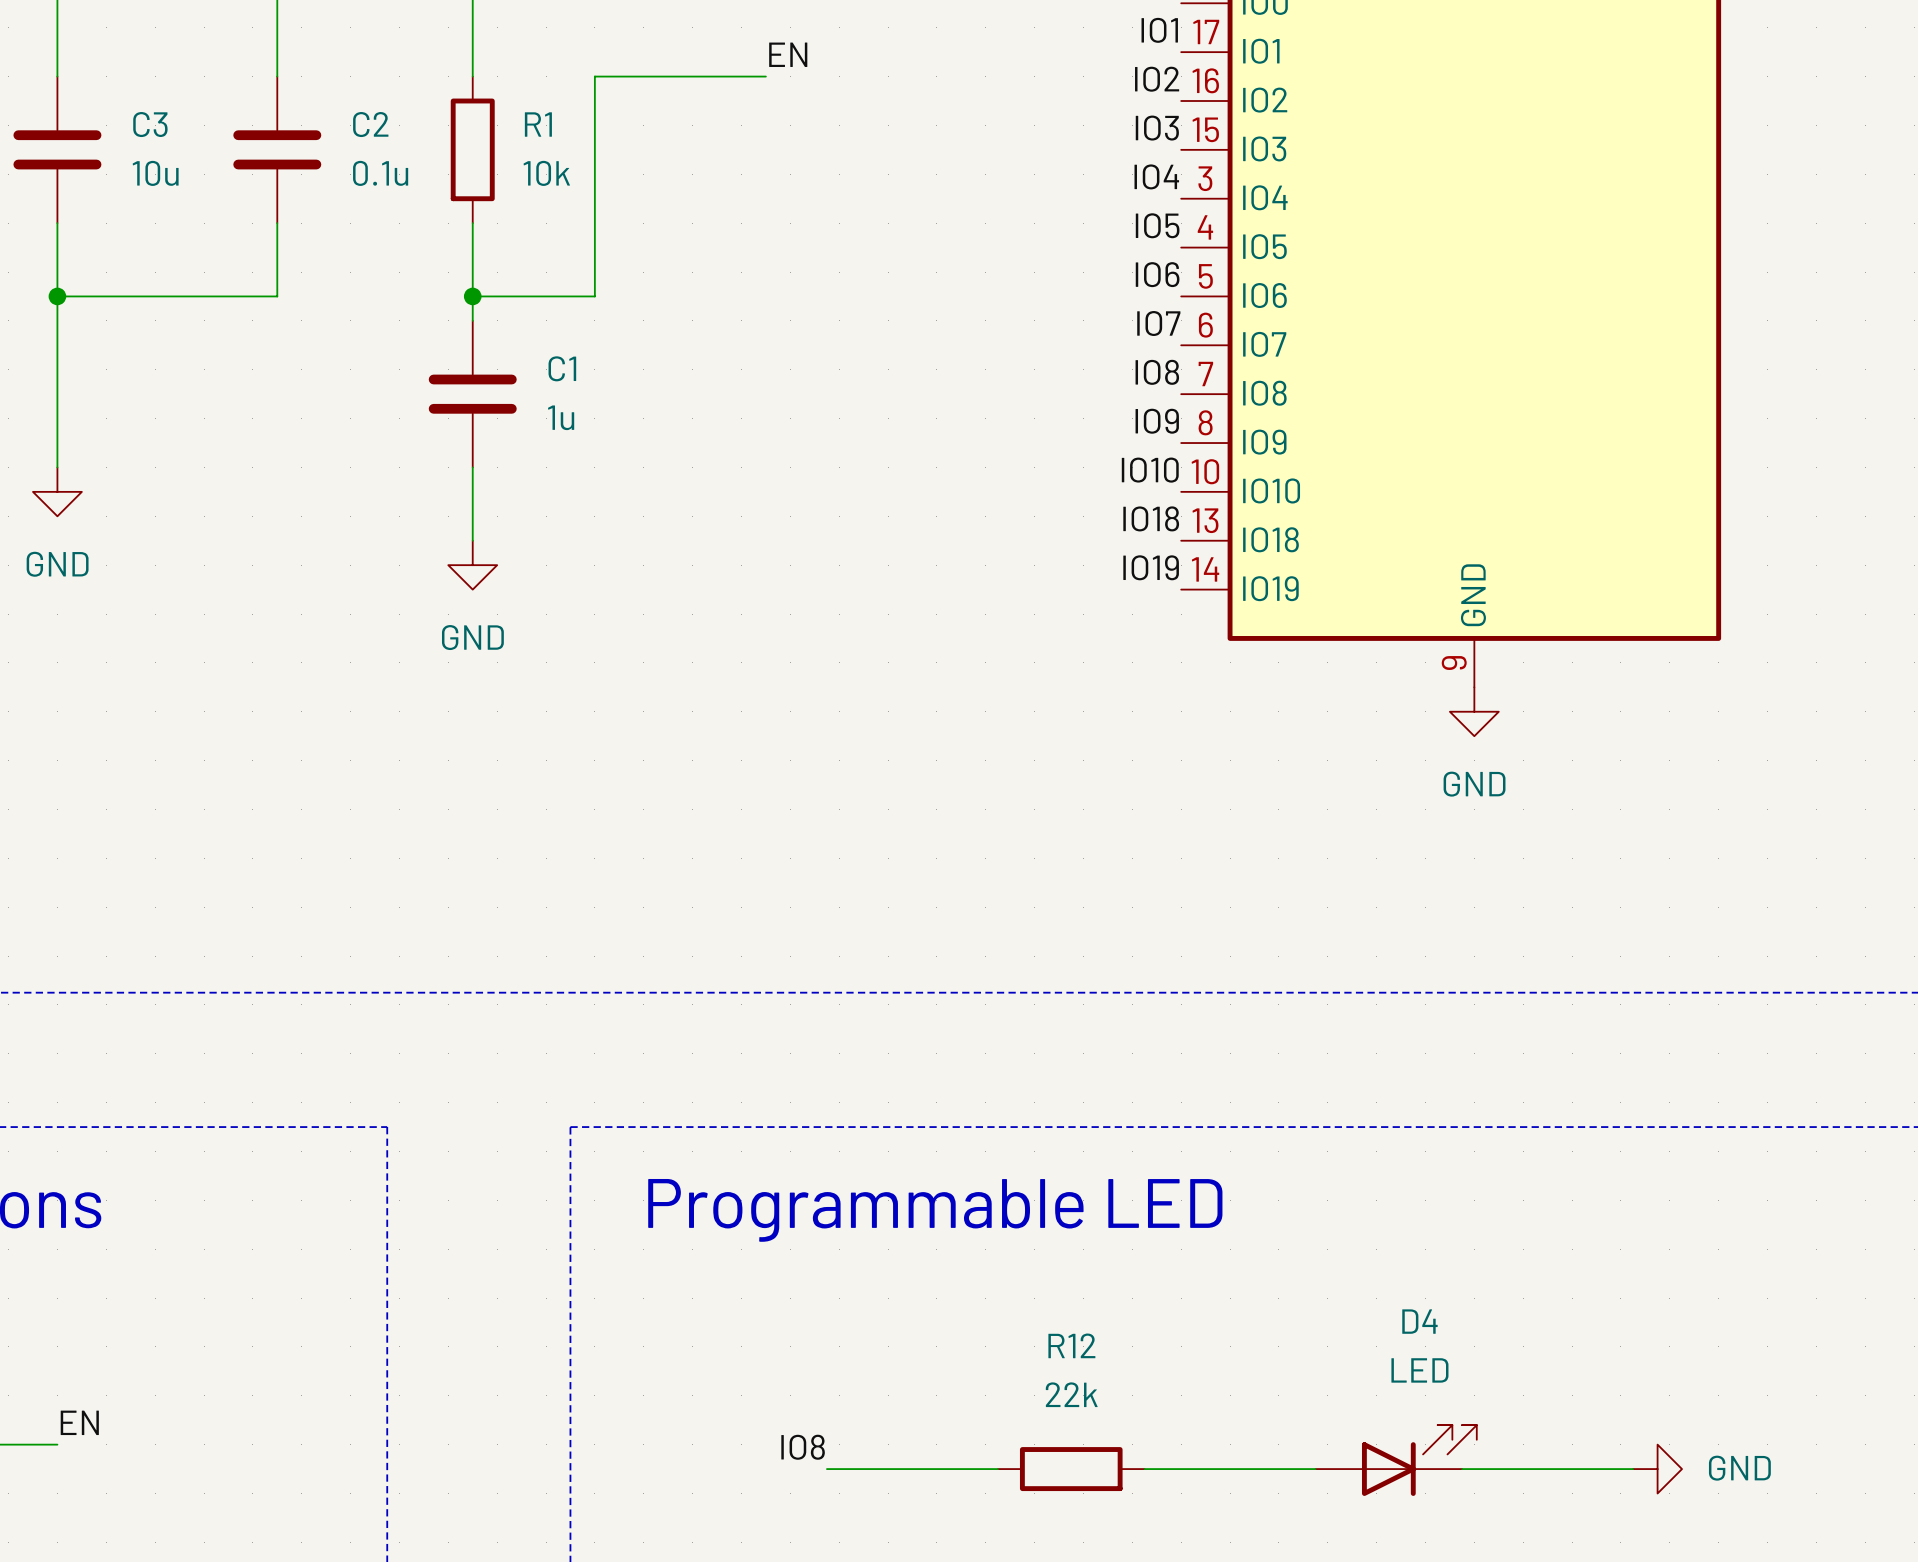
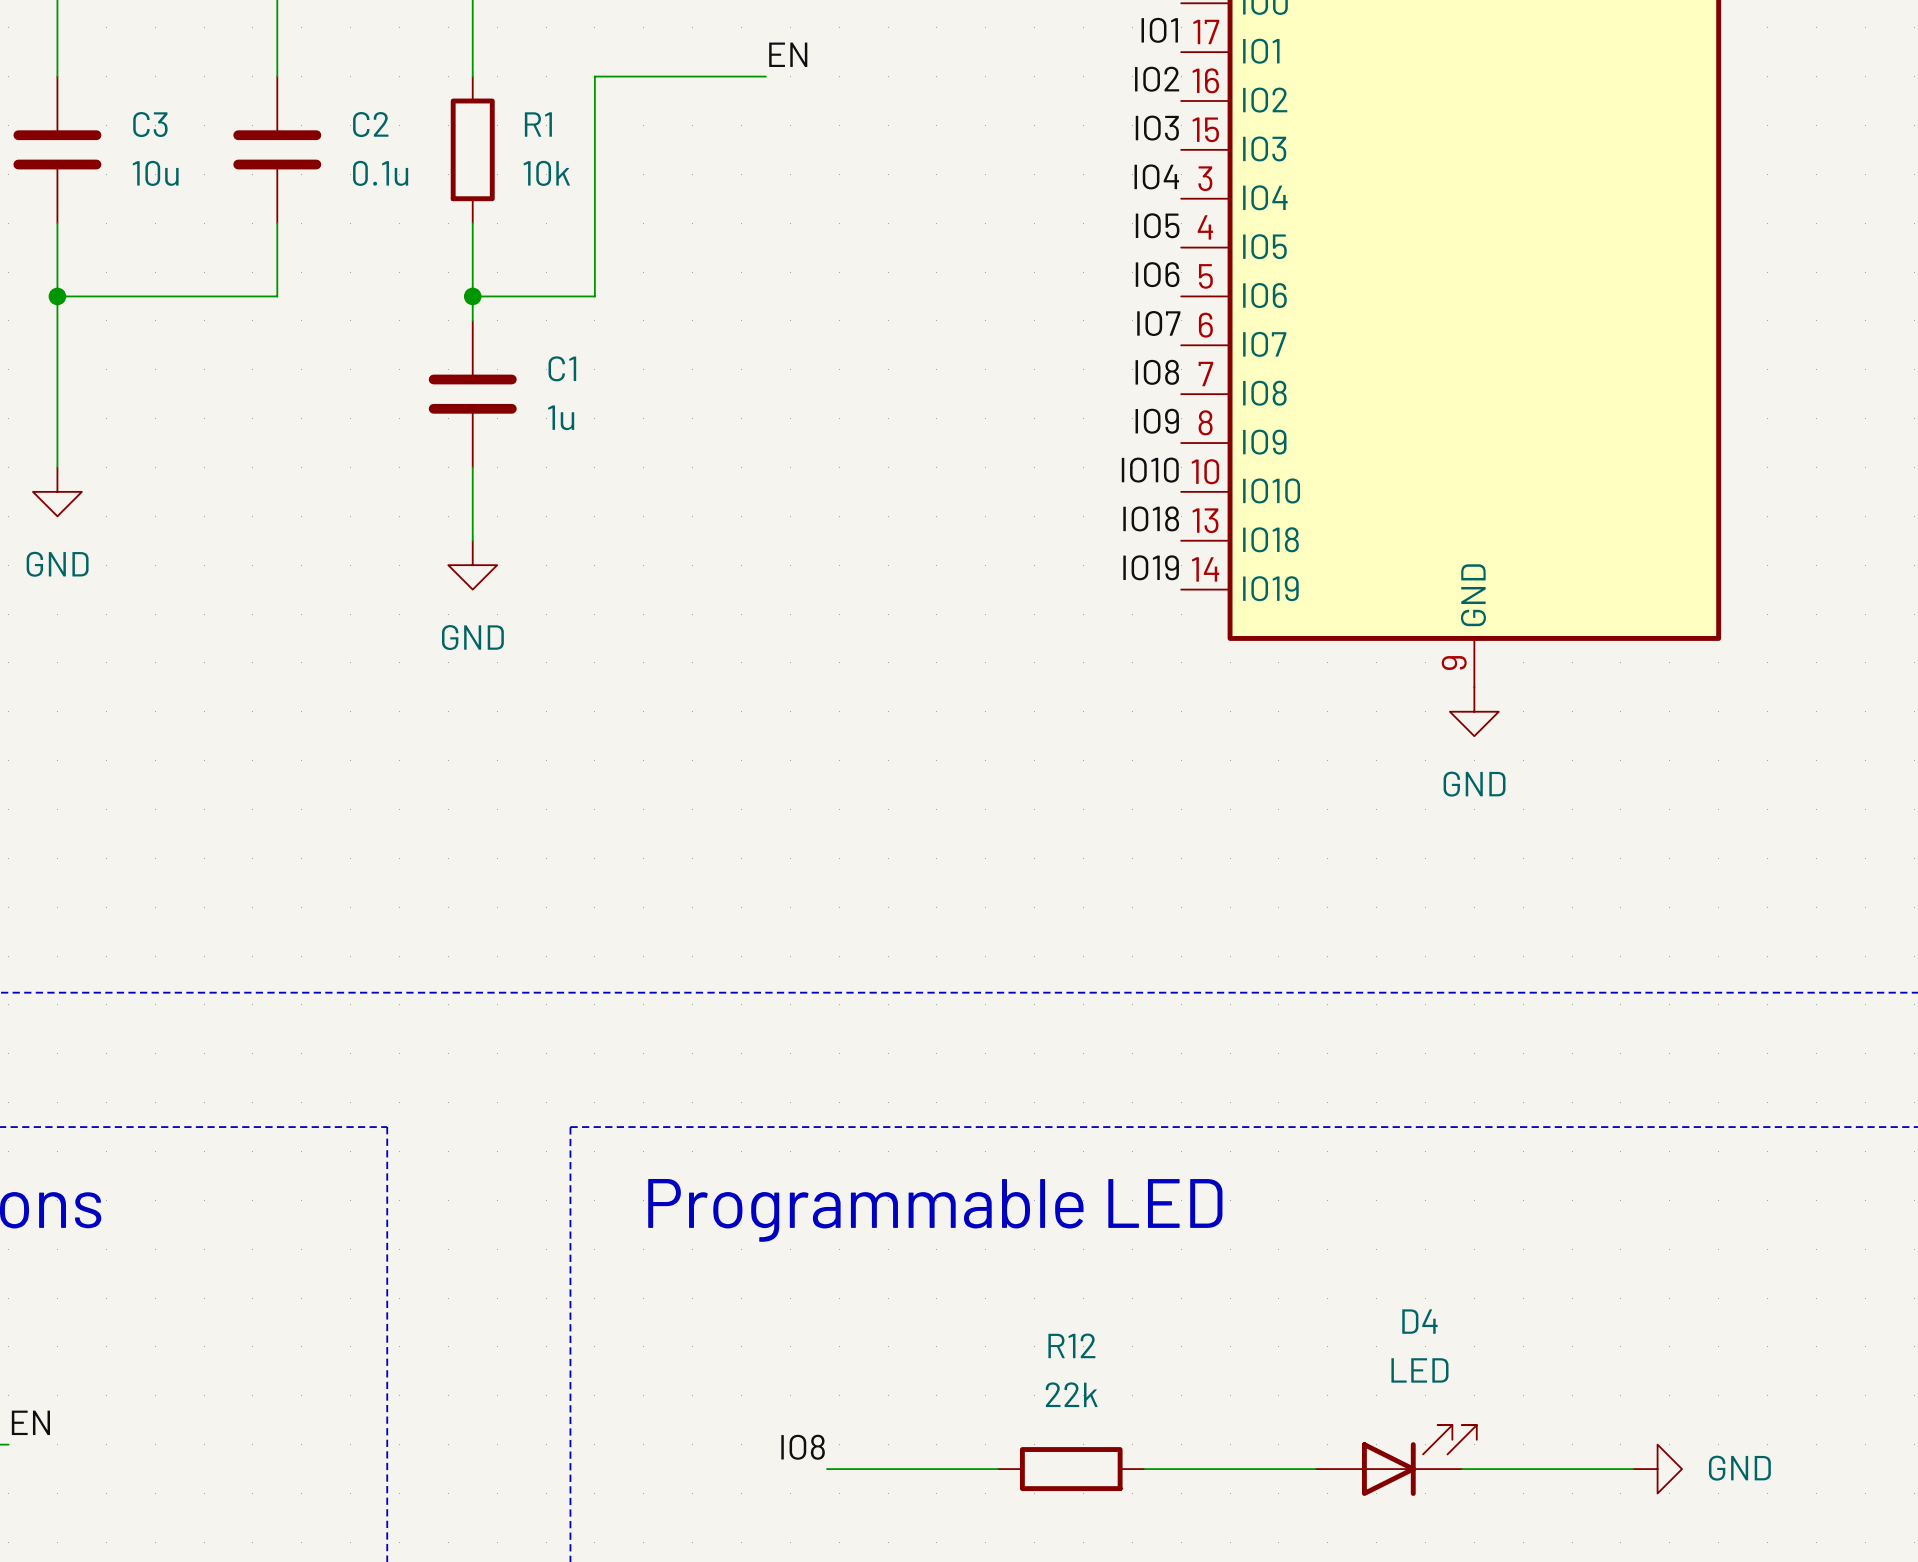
label position: EN (79, 1422) -> EN (30, 1422)
wire: (8, 1444) (57, 1444) -> none

